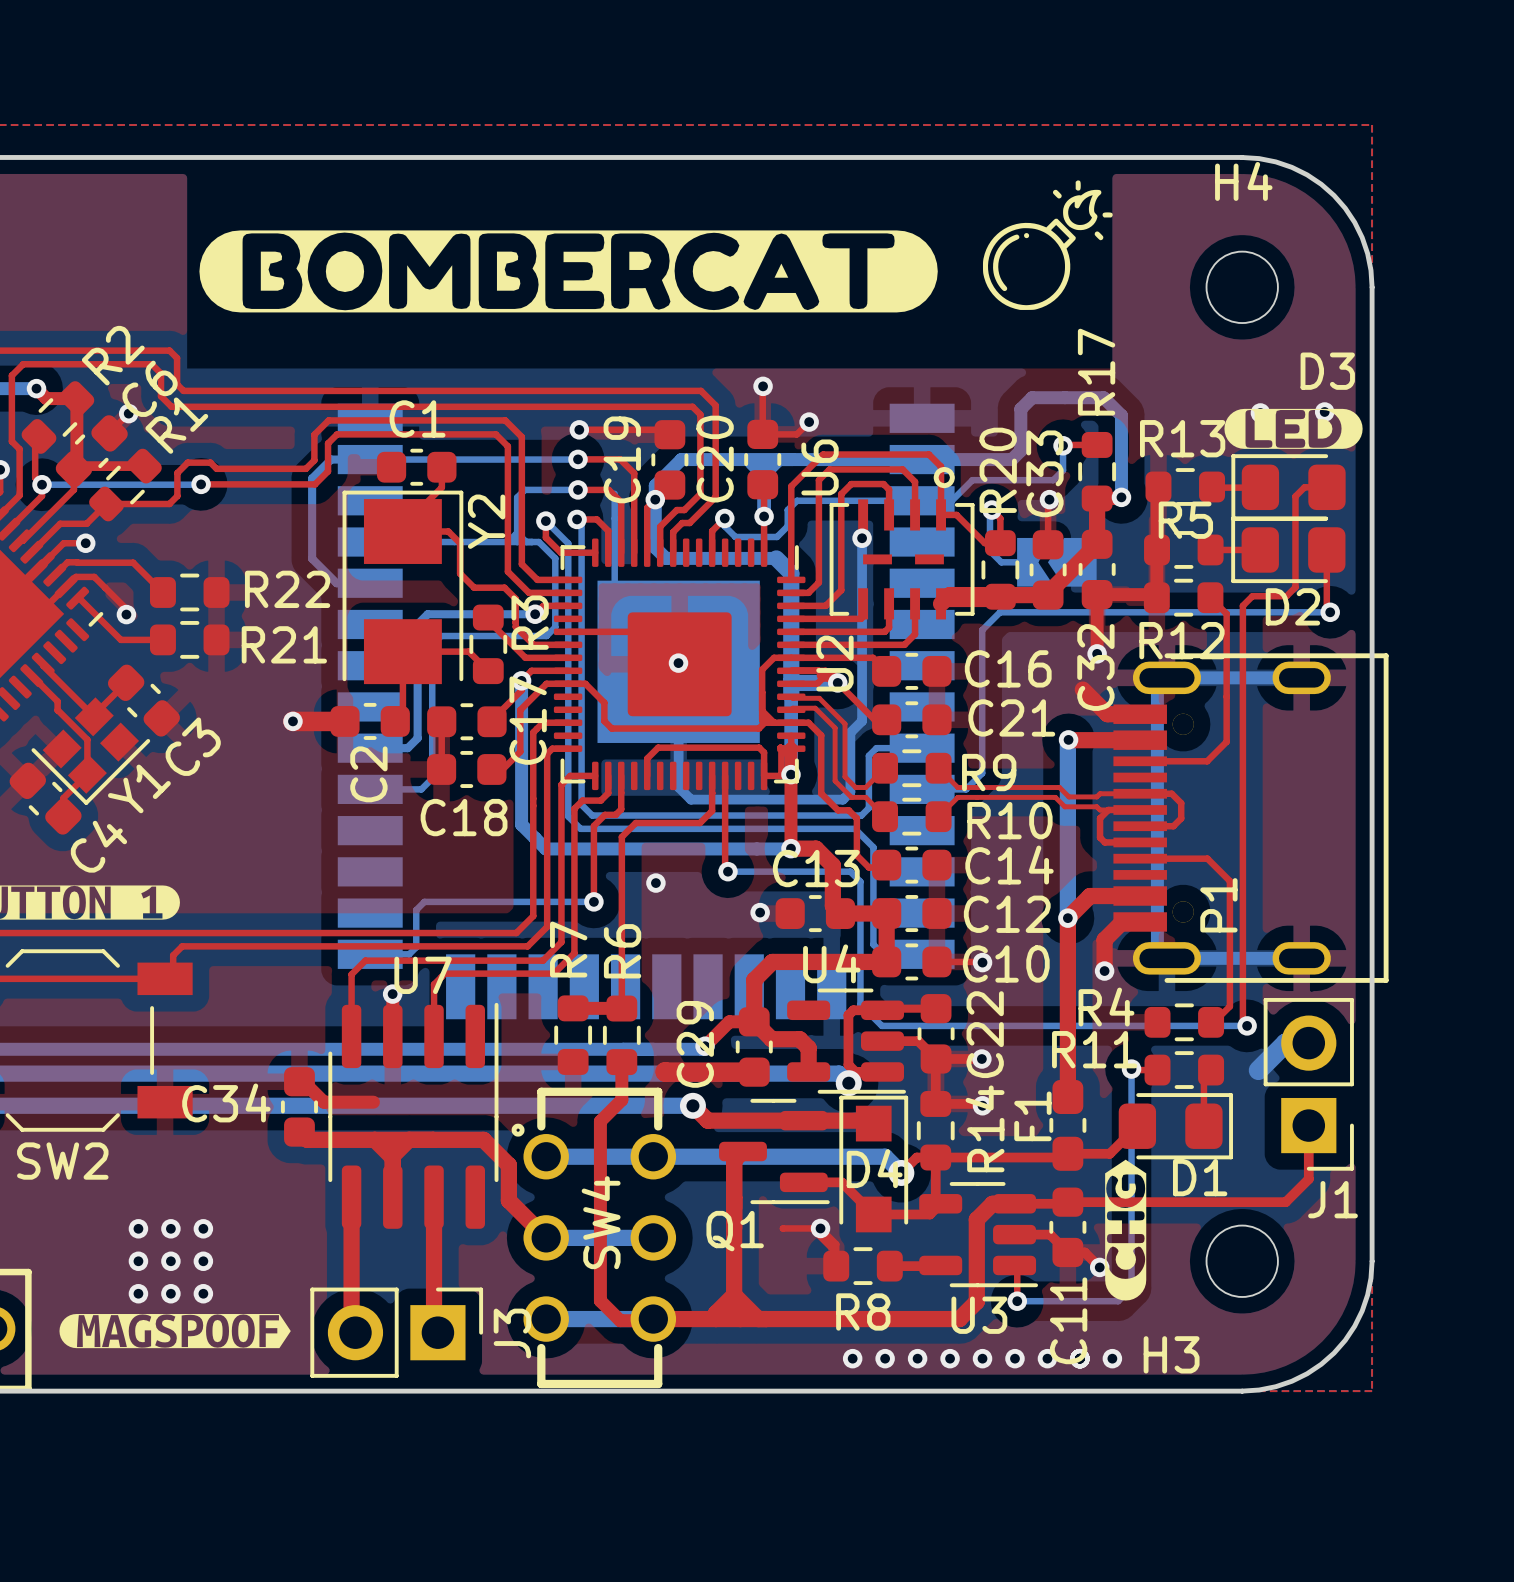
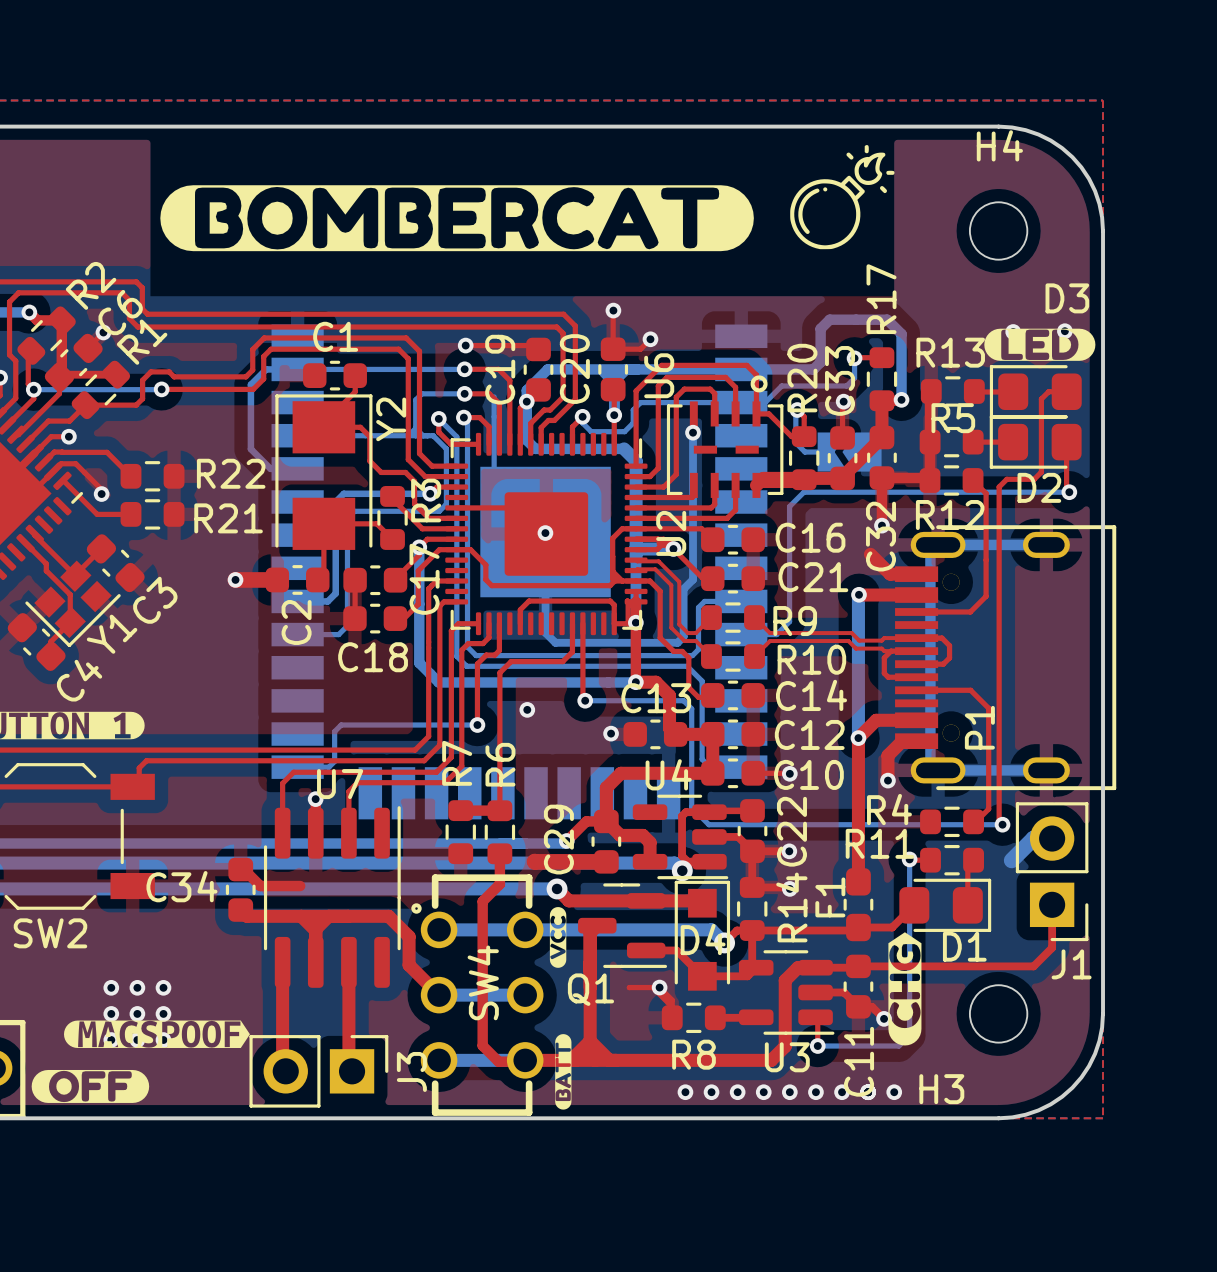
drawing: none -> [549, 907, 567, 968]
drawing: none -> [555, 1034, 572, 1110]
drawing: none -> [31, 1069, 150, 1103]
drawing position: (175, 1331) -> (156, 1034)

